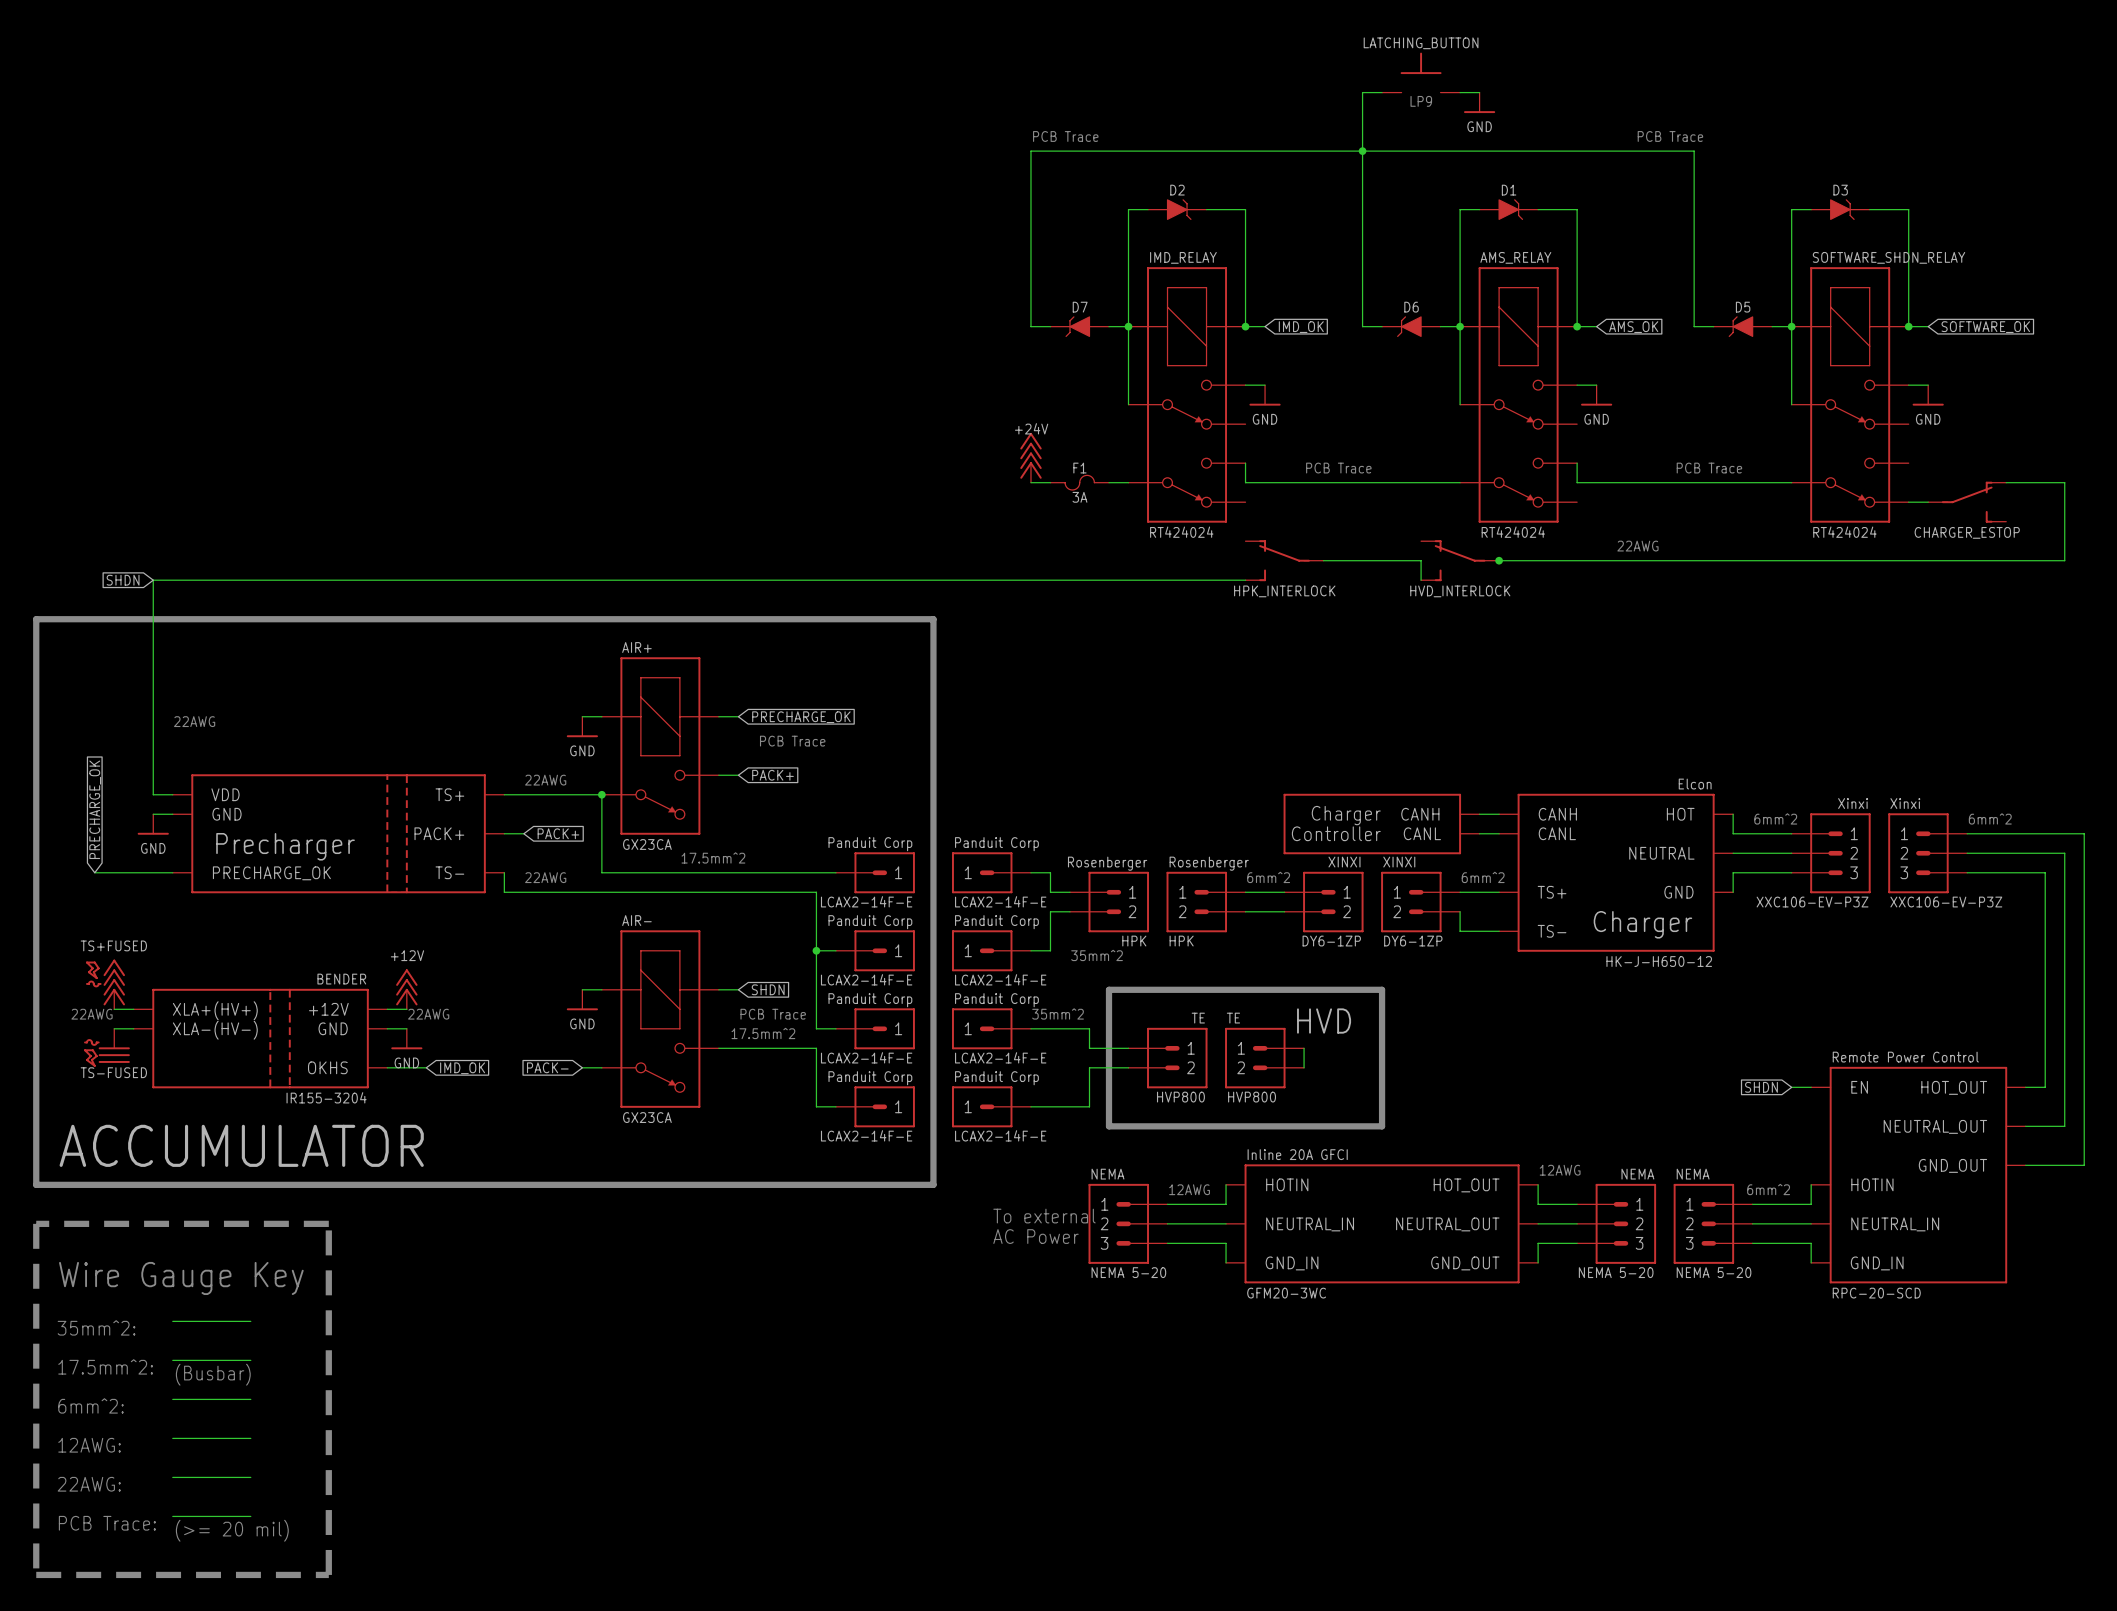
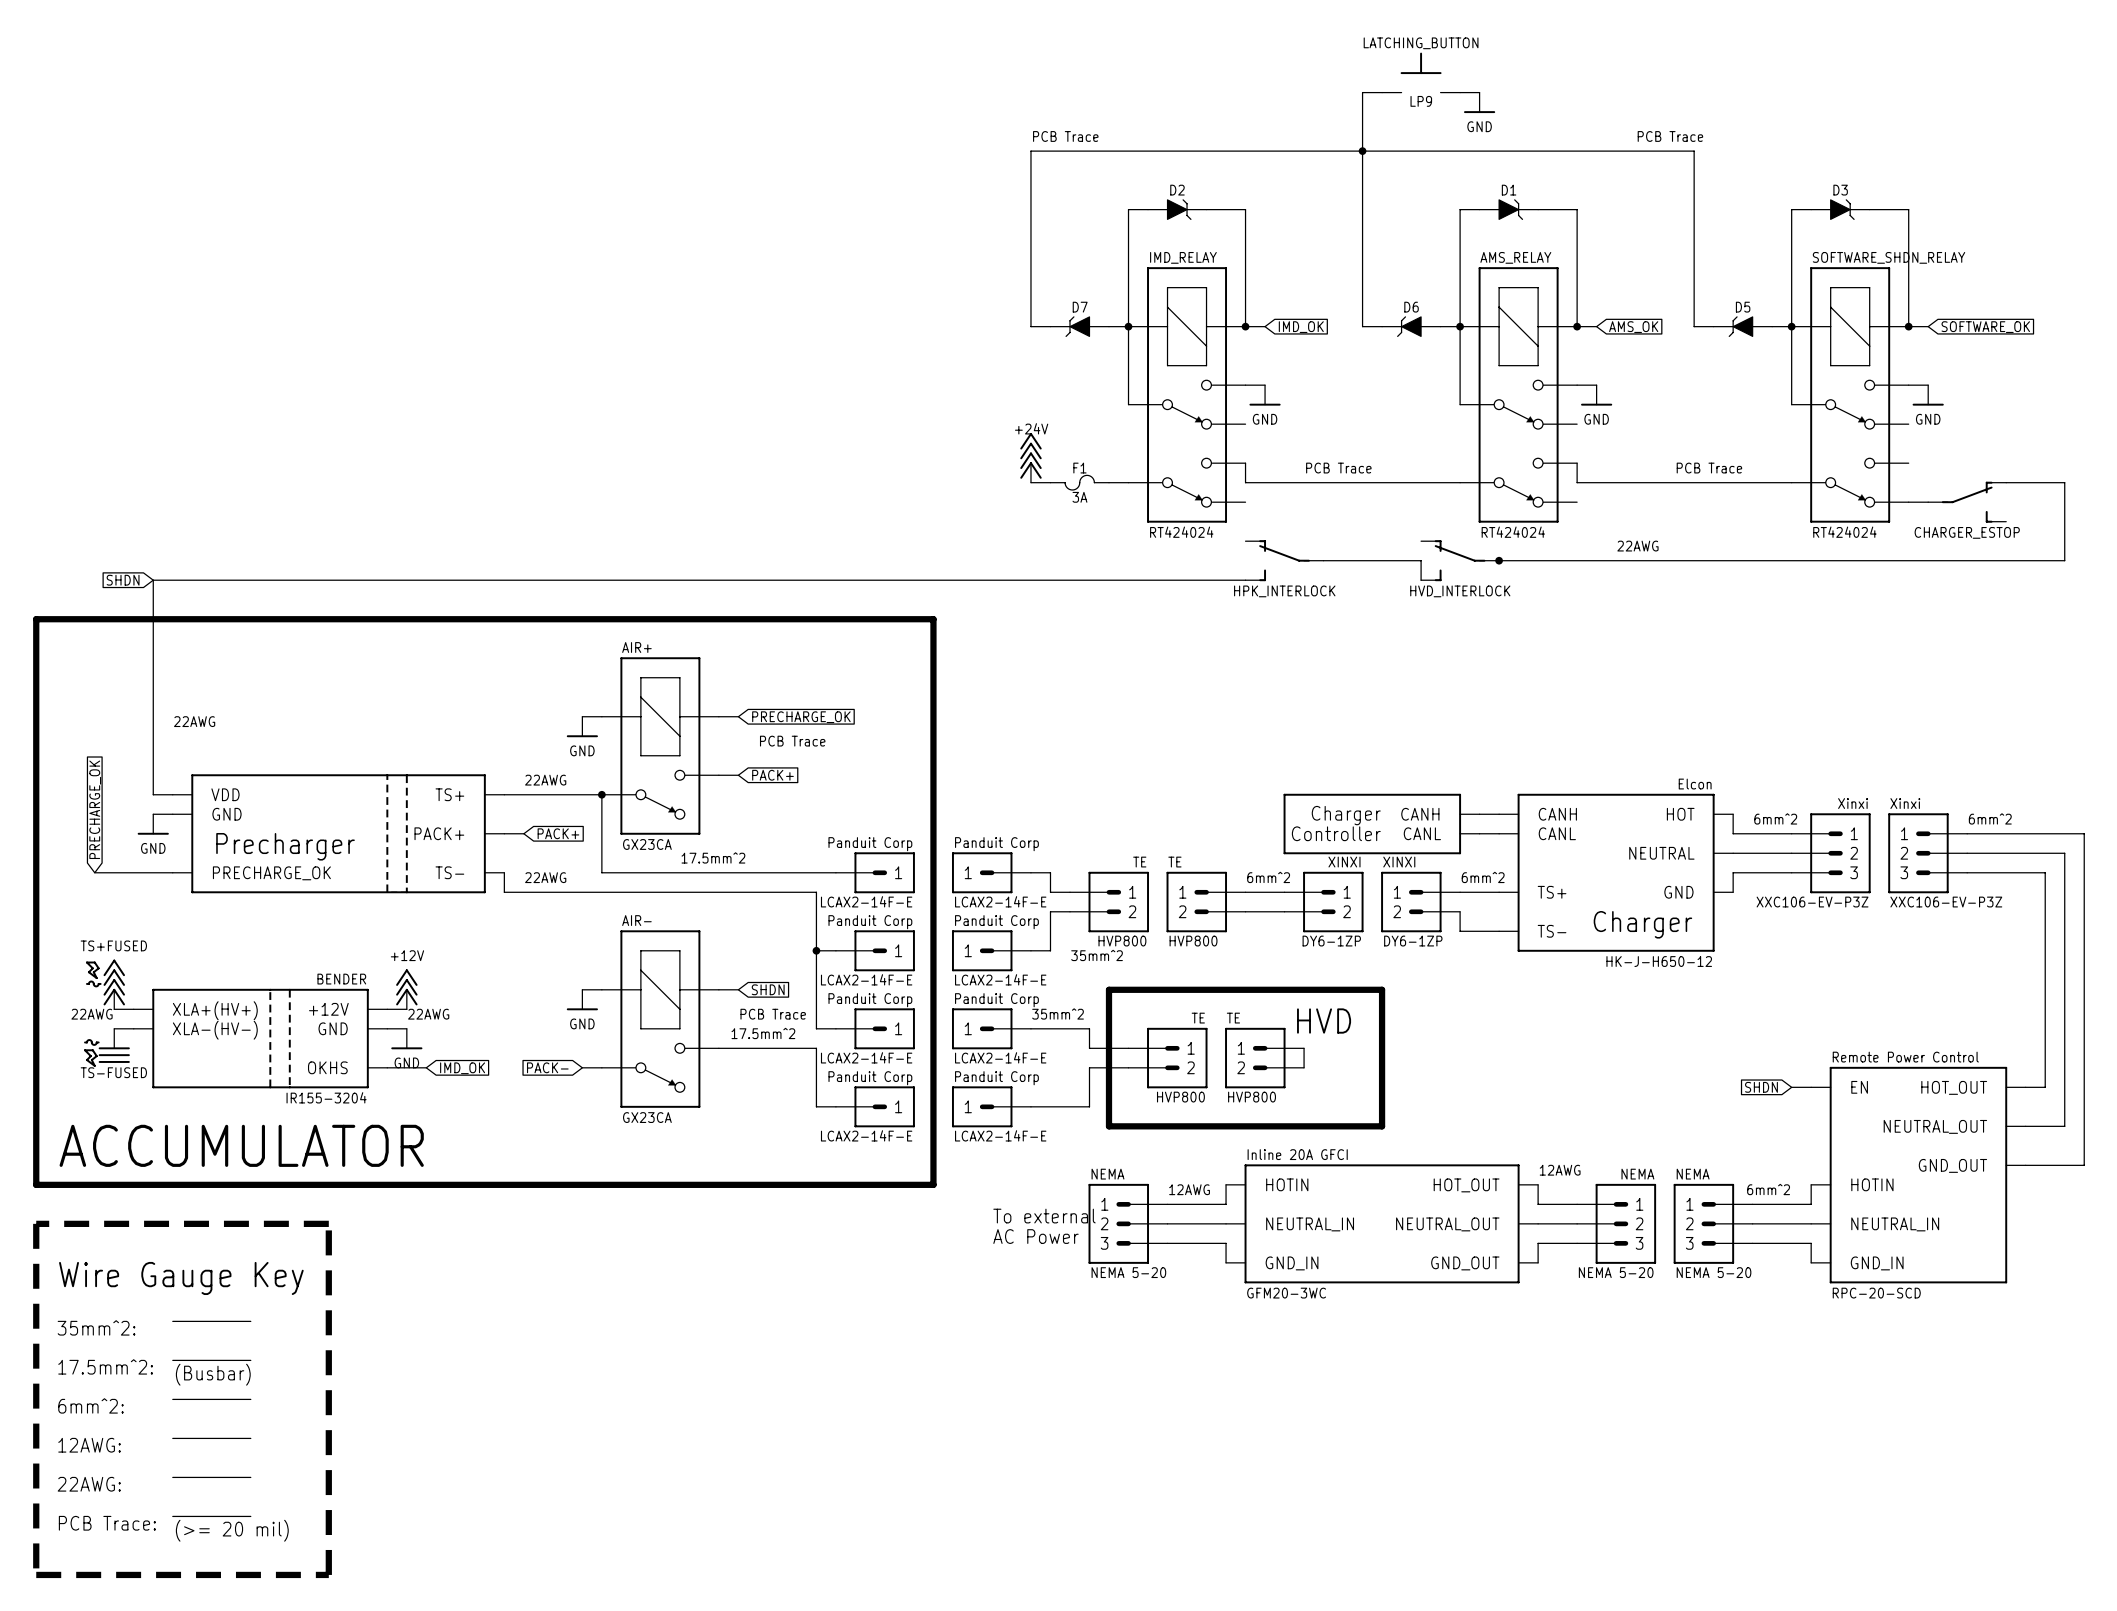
part text: Rosenberger (1107, 863) -> TE (1139, 862)
part text: Rosenberger (1209, 863) -> TE (1174, 862)
part text: HPK (1134, 941) -> HVP800 (1122, 941)
part text: HPK (1181, 941) -> HVP800 (1193, 941)

